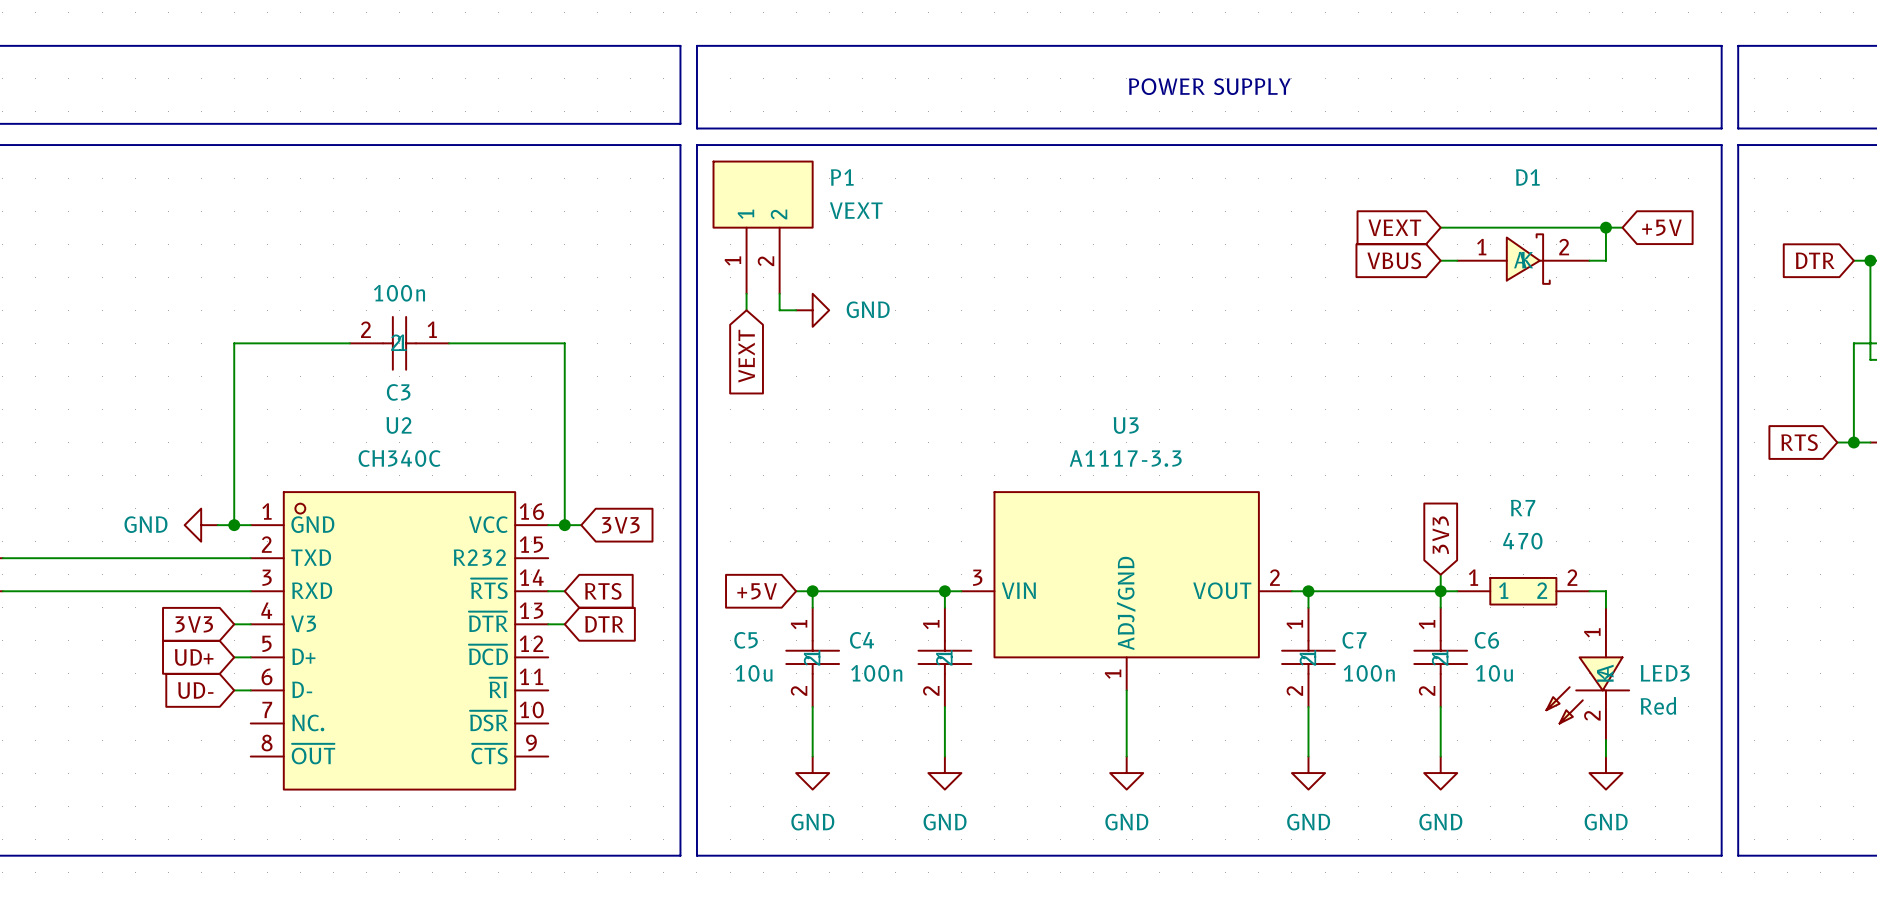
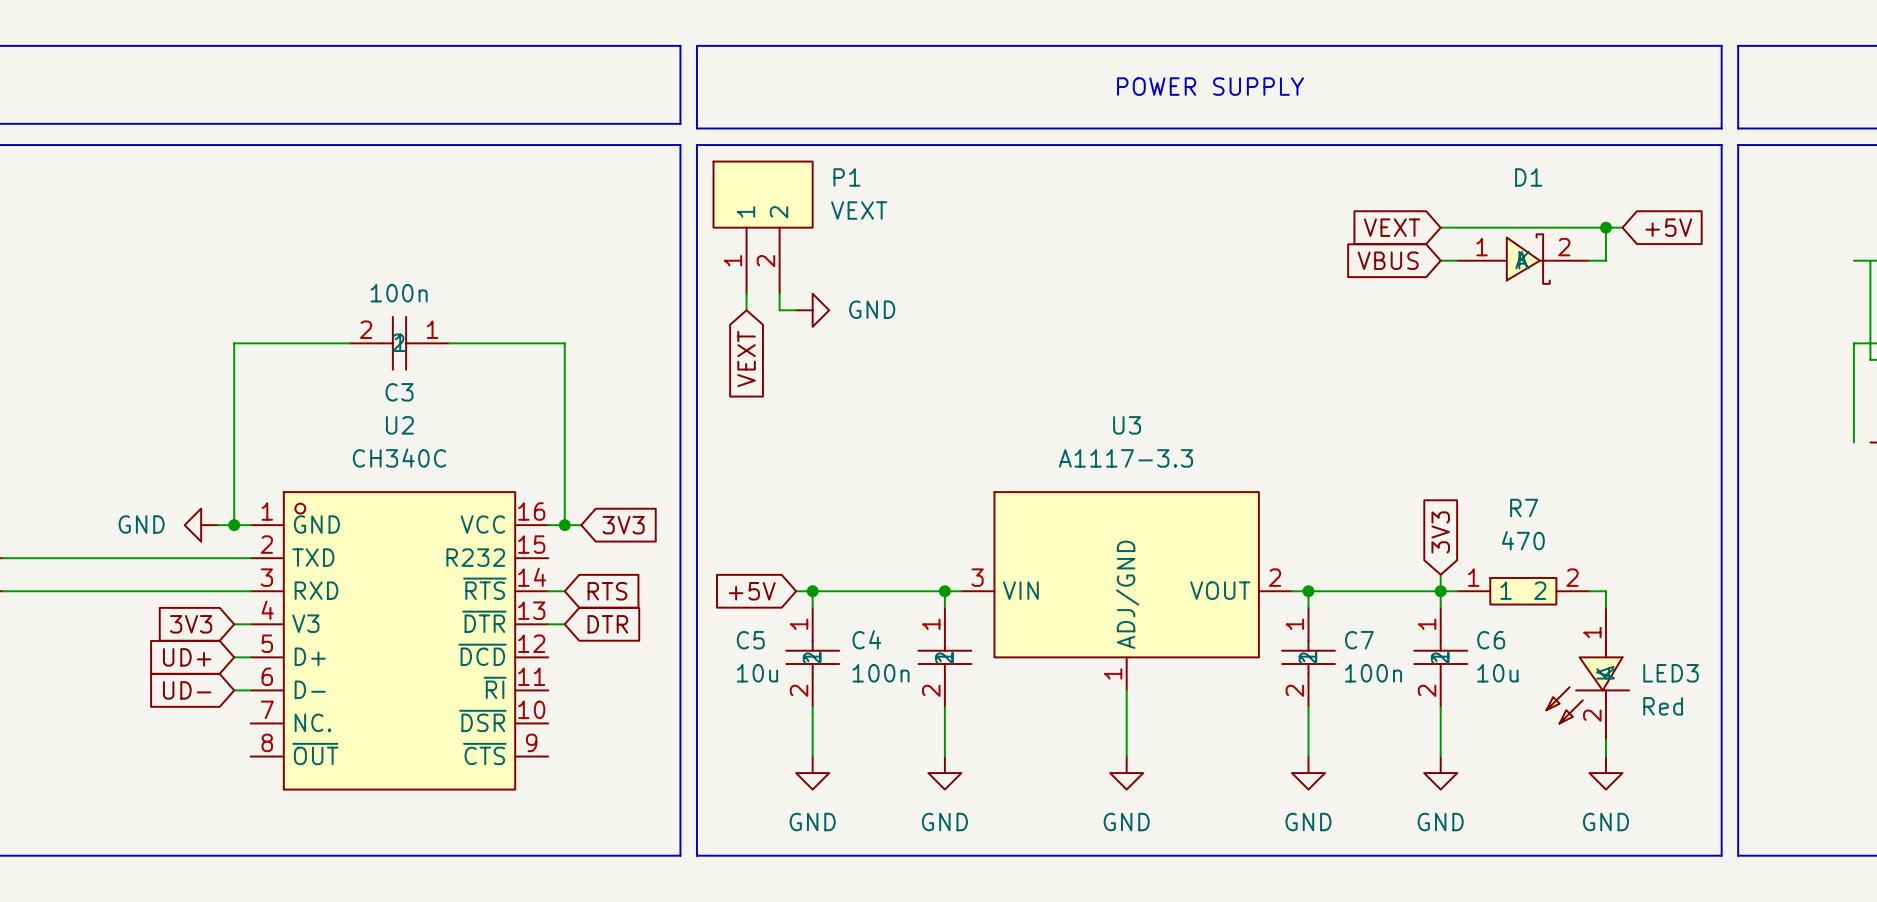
global label: DTR (1815, 260) -> none
junction: (1870, 260) -> none
global label: RTS (1799, 442) -> none
wire: (1837, 442) (1870, 442) -> none
junction: (1853, 442) -> none

